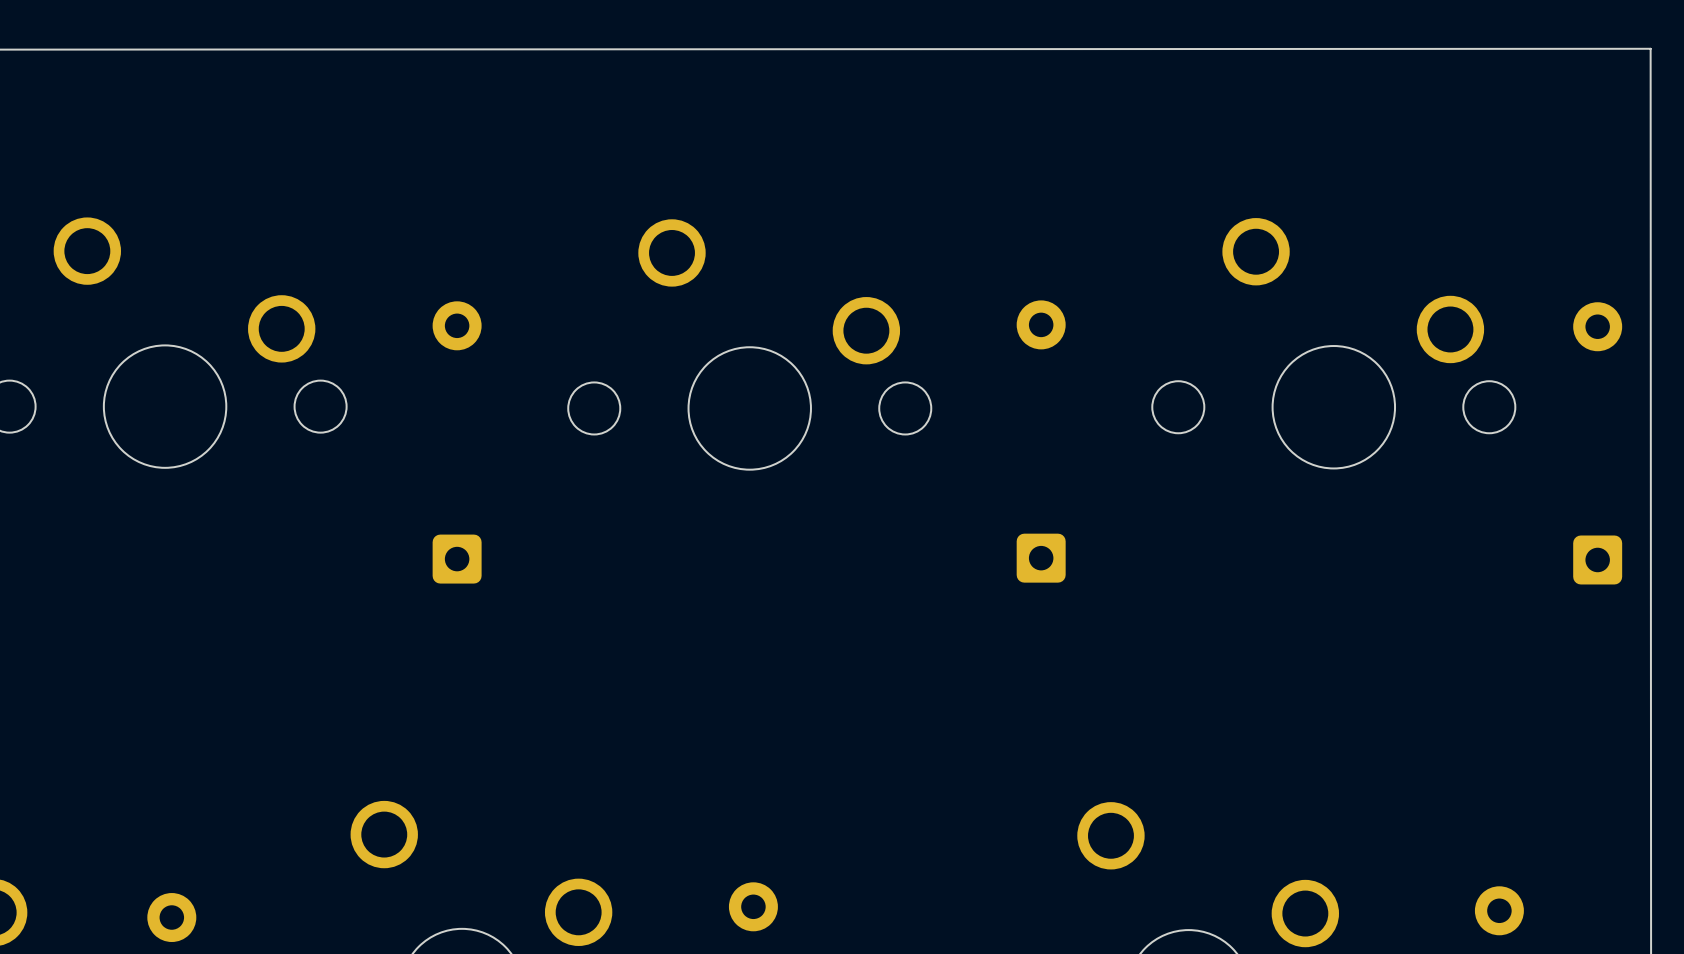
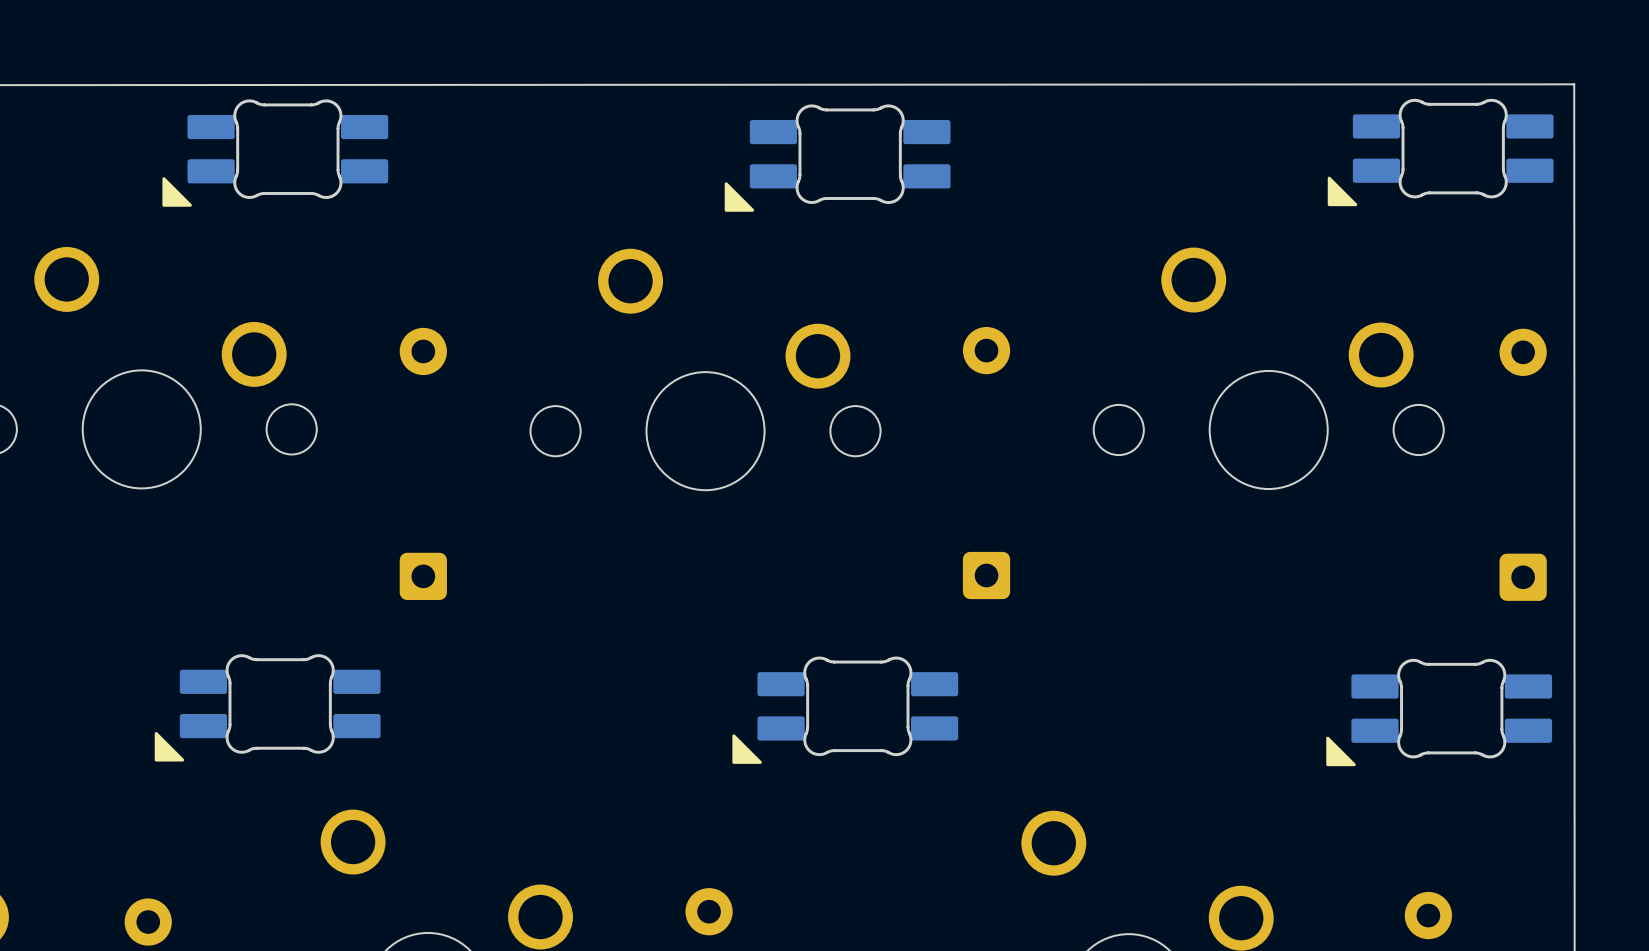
part: none -> (1440, 152)
part: none -> (275, 153)
part: none -> (837, 158)
part: none -> (267, 707)
part: none -> (845, 710)
part: none -> (1439, 712)

